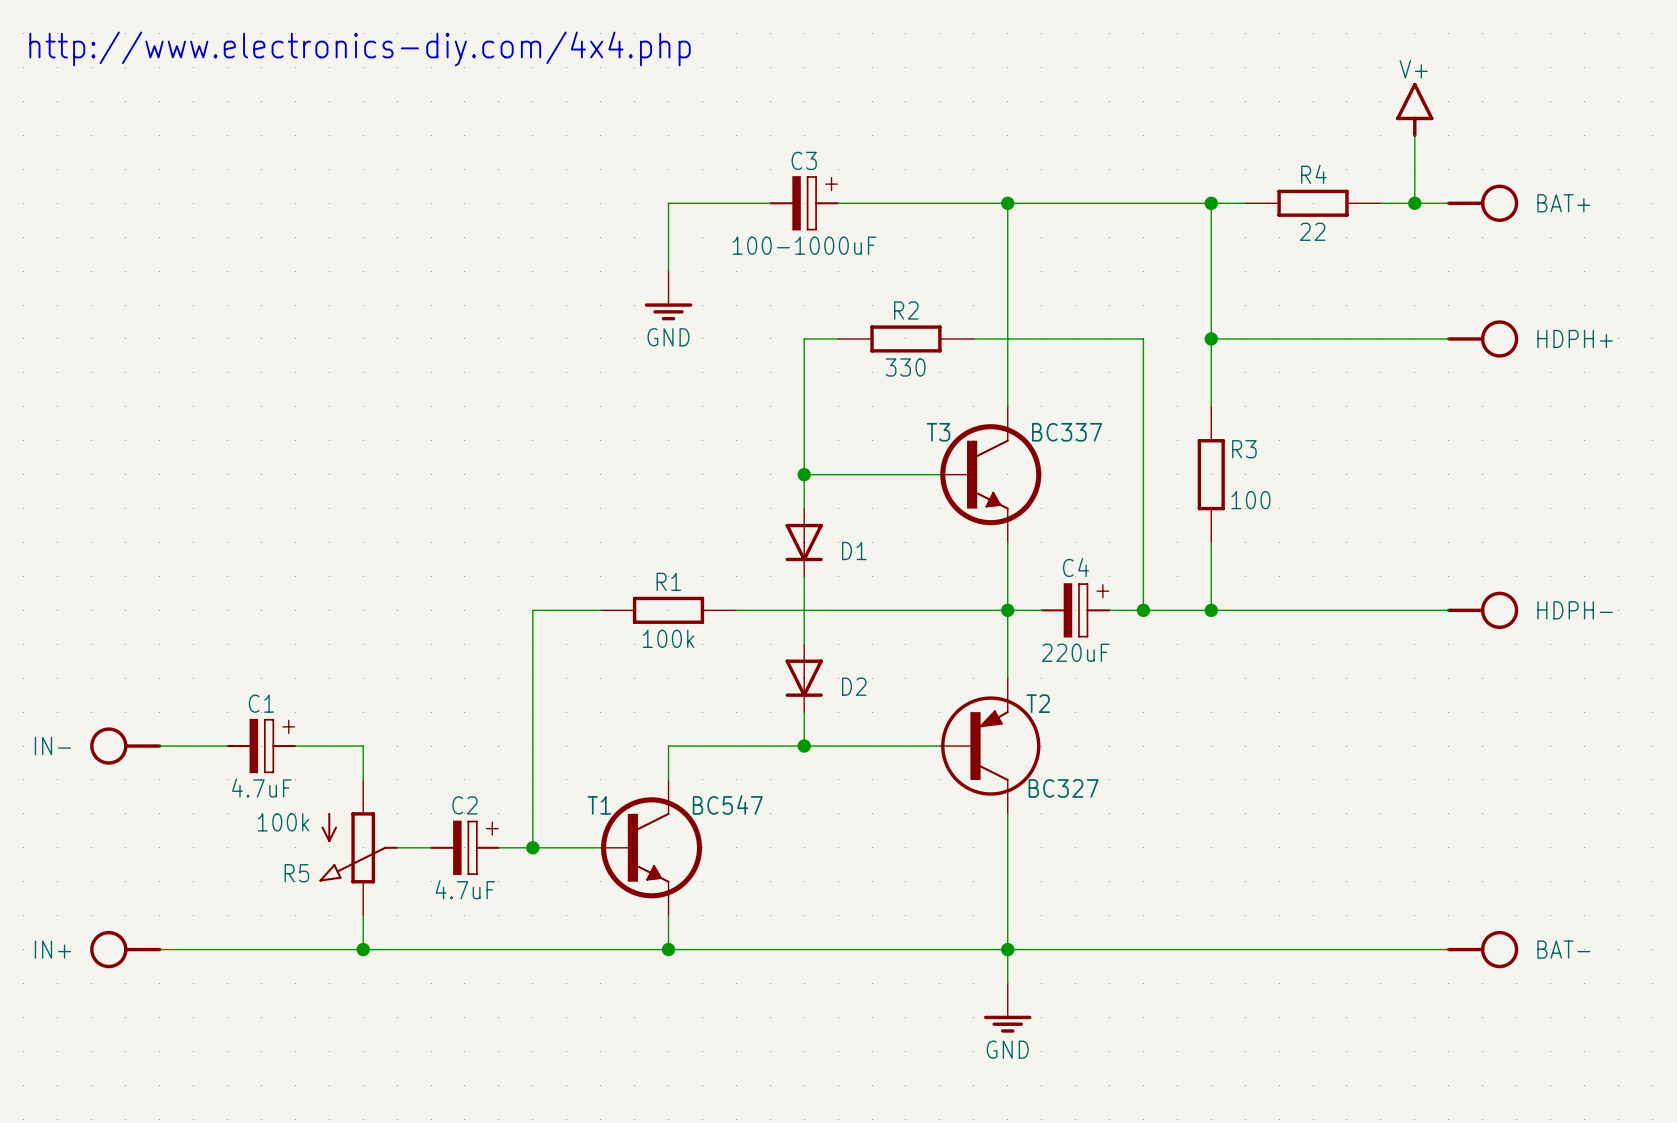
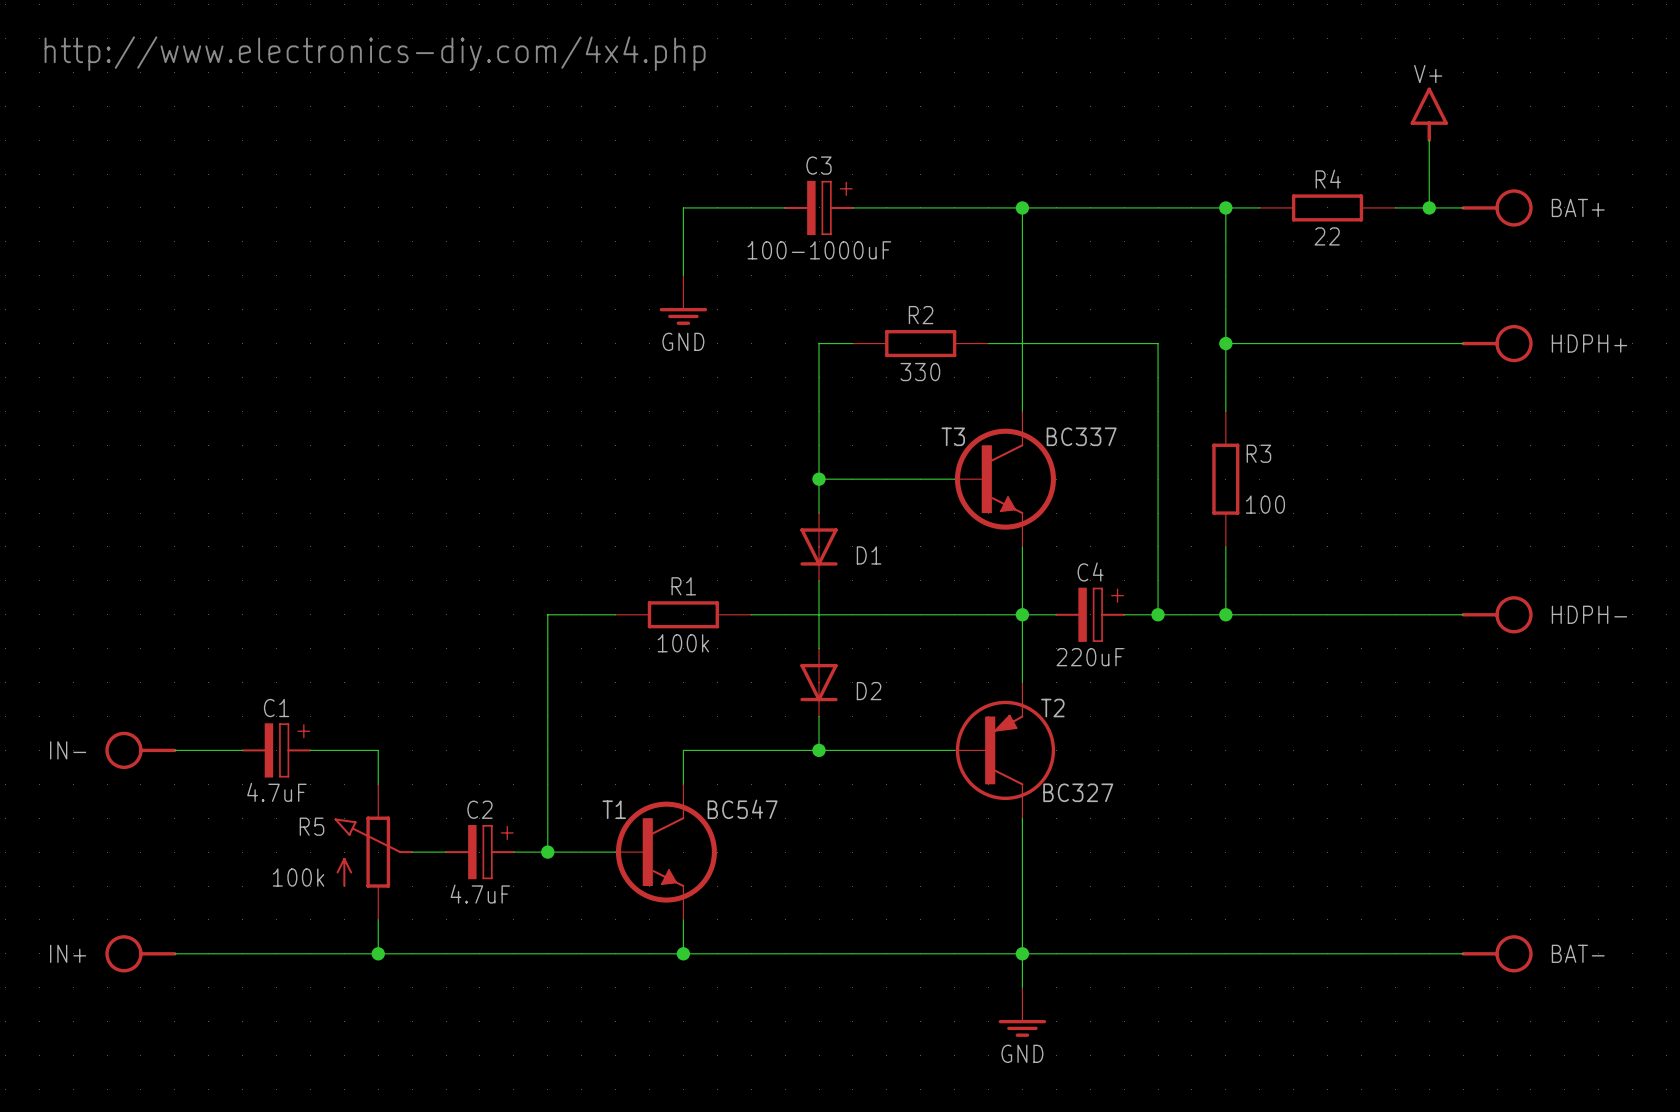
R5 flip: as is (358, 847) -> up-down (373, 852)

